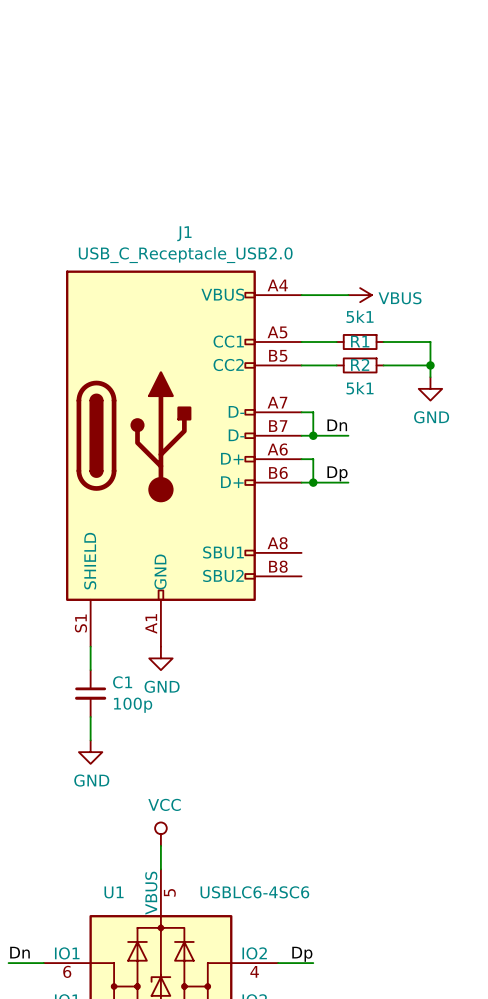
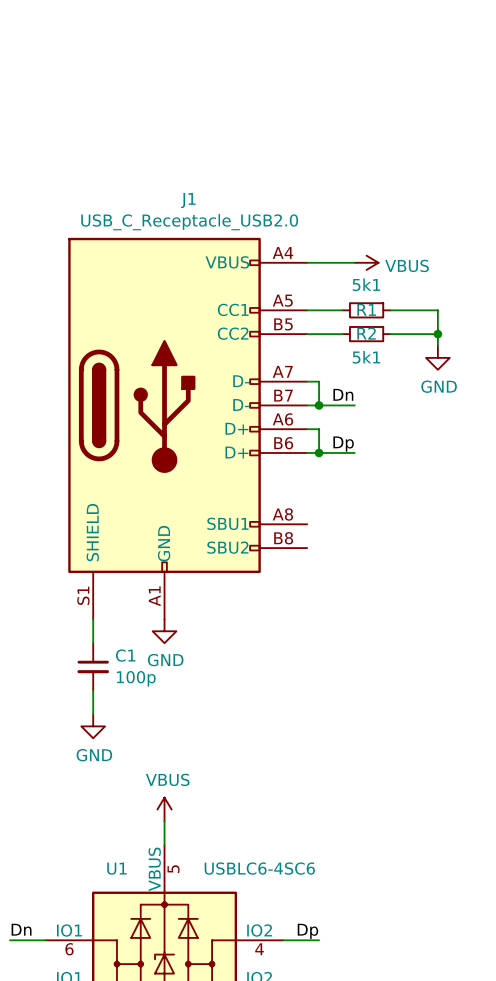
power symbol: VCC (160, 834) -> VBUS (164, 809)

